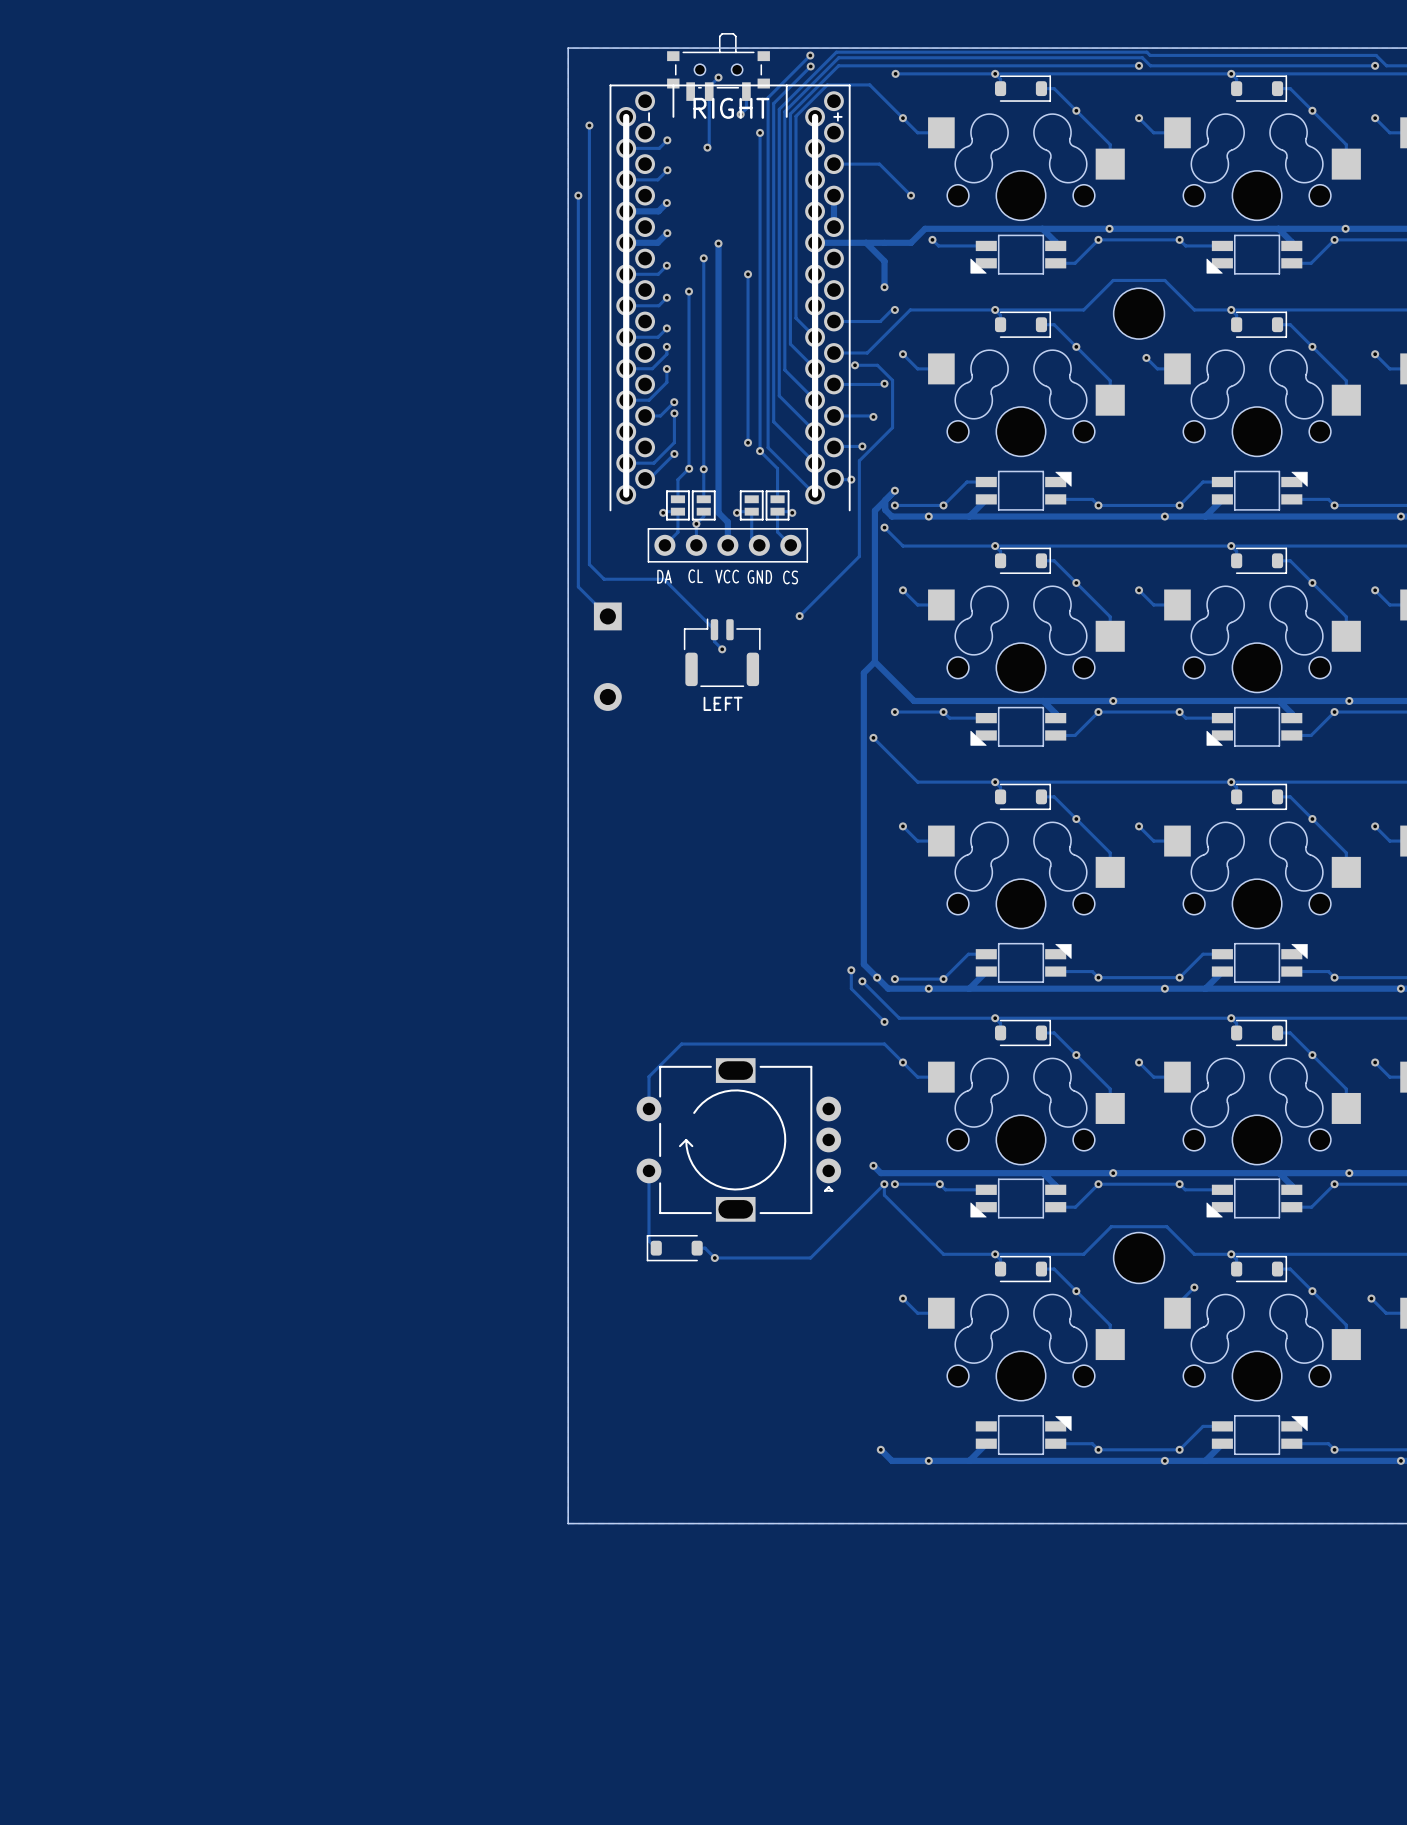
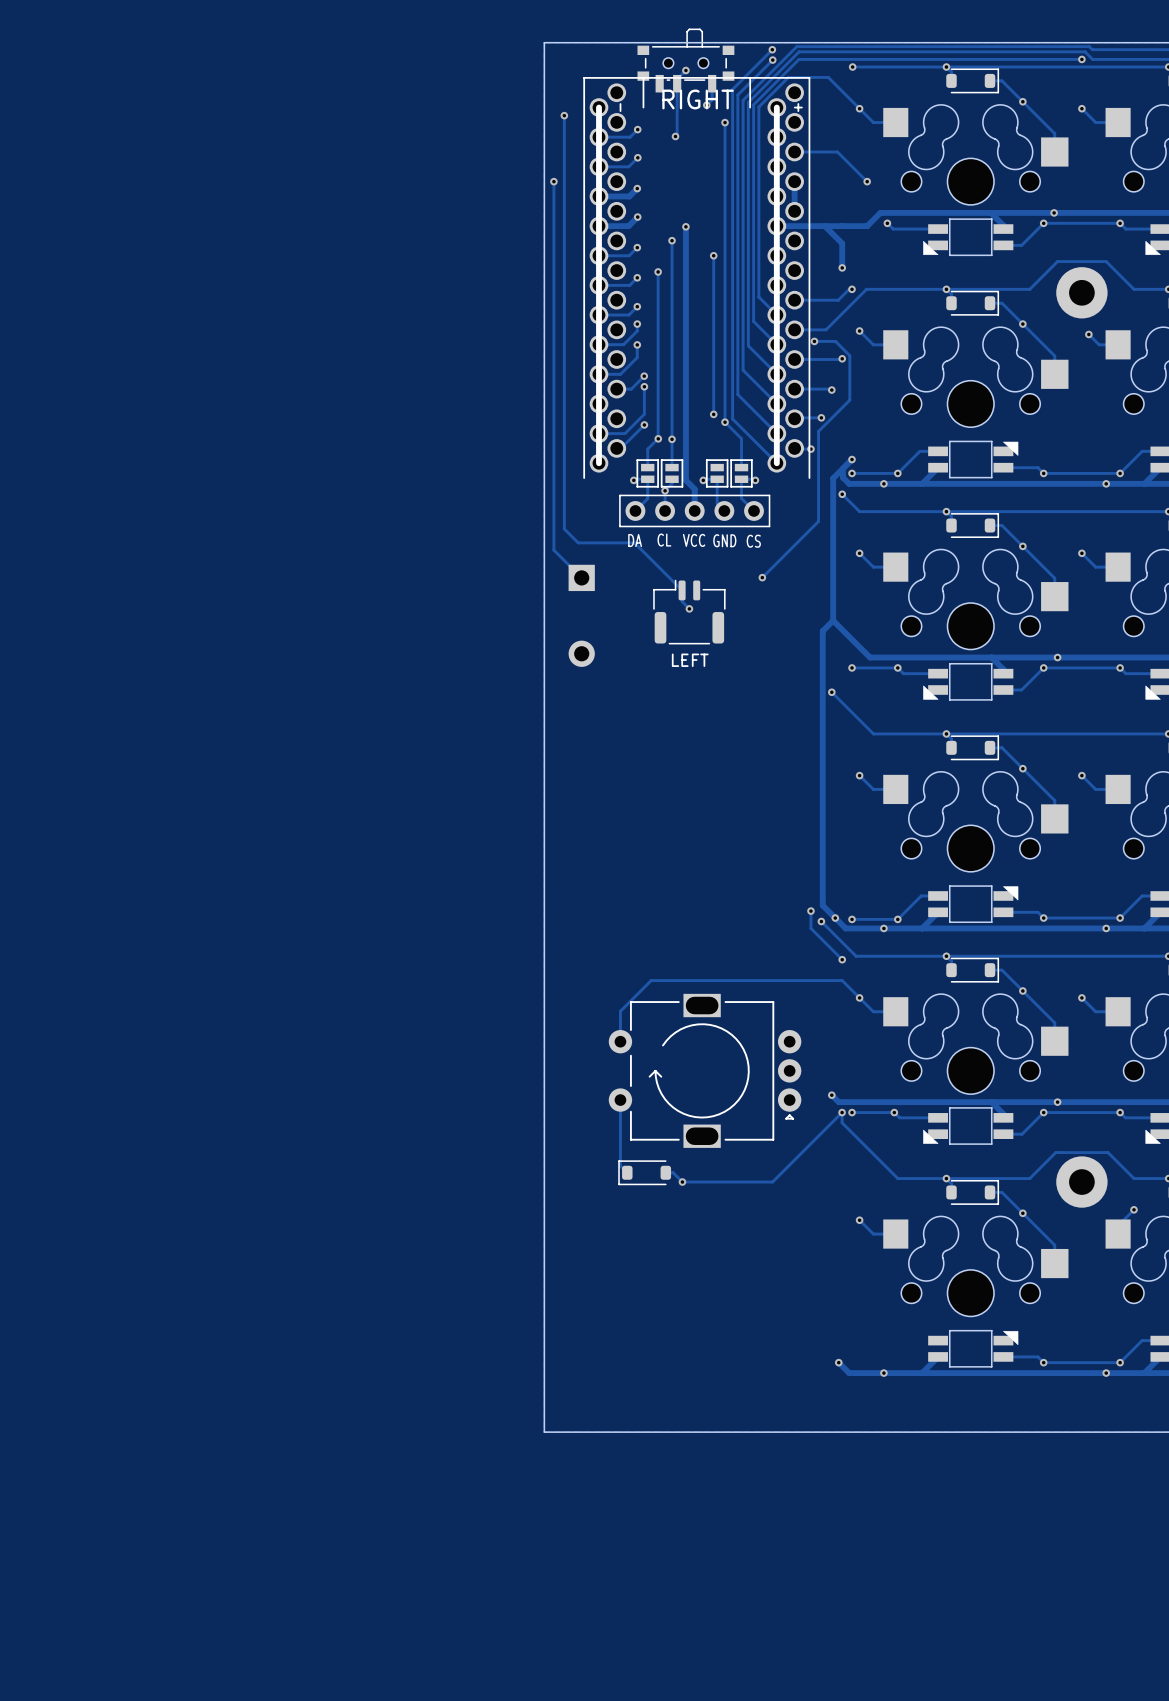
part footprint: [1113, 288, 1165, 340] -> [1056, 267, 1108, 319]
part footprint: [1113, 1232, 1165, 1284] -> [1056, 1156, 1108, 1208]

